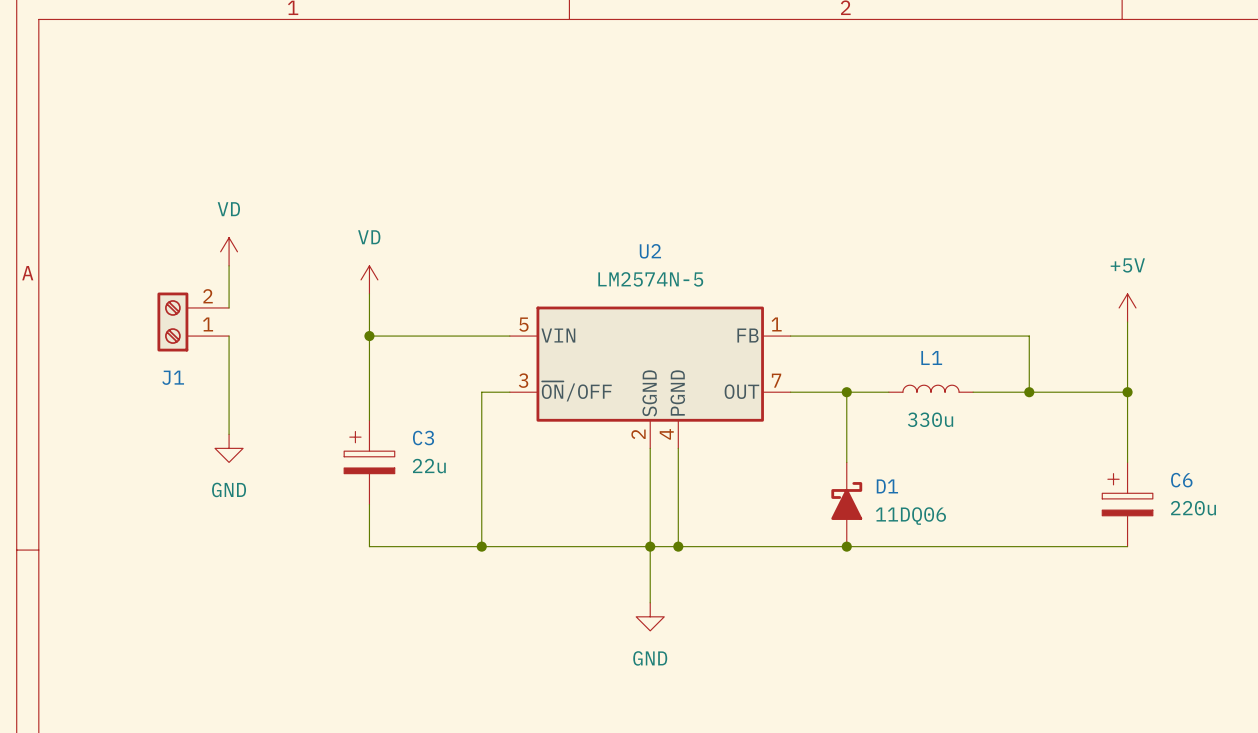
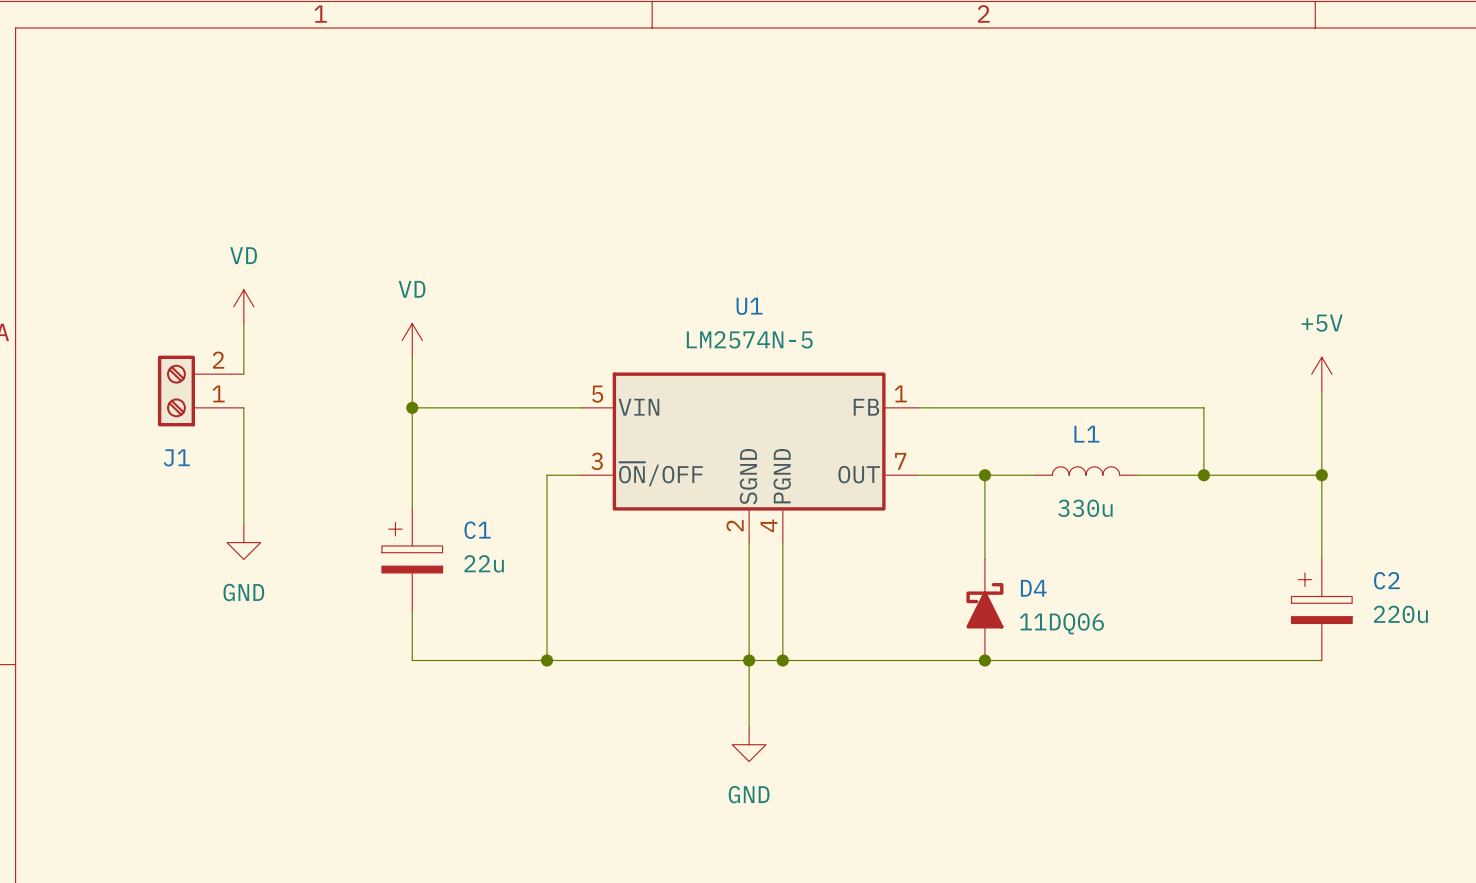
U2 name: U2 (650, 251) -> U1 (749, 306)
C3 name: C3 (423, 438) -> C1 (477, 530)
C6 name: C6 (1181, 480) -> C2 (1386, 580)
D1 name: D1 (887, 486) -> D4 (1033, 588)

